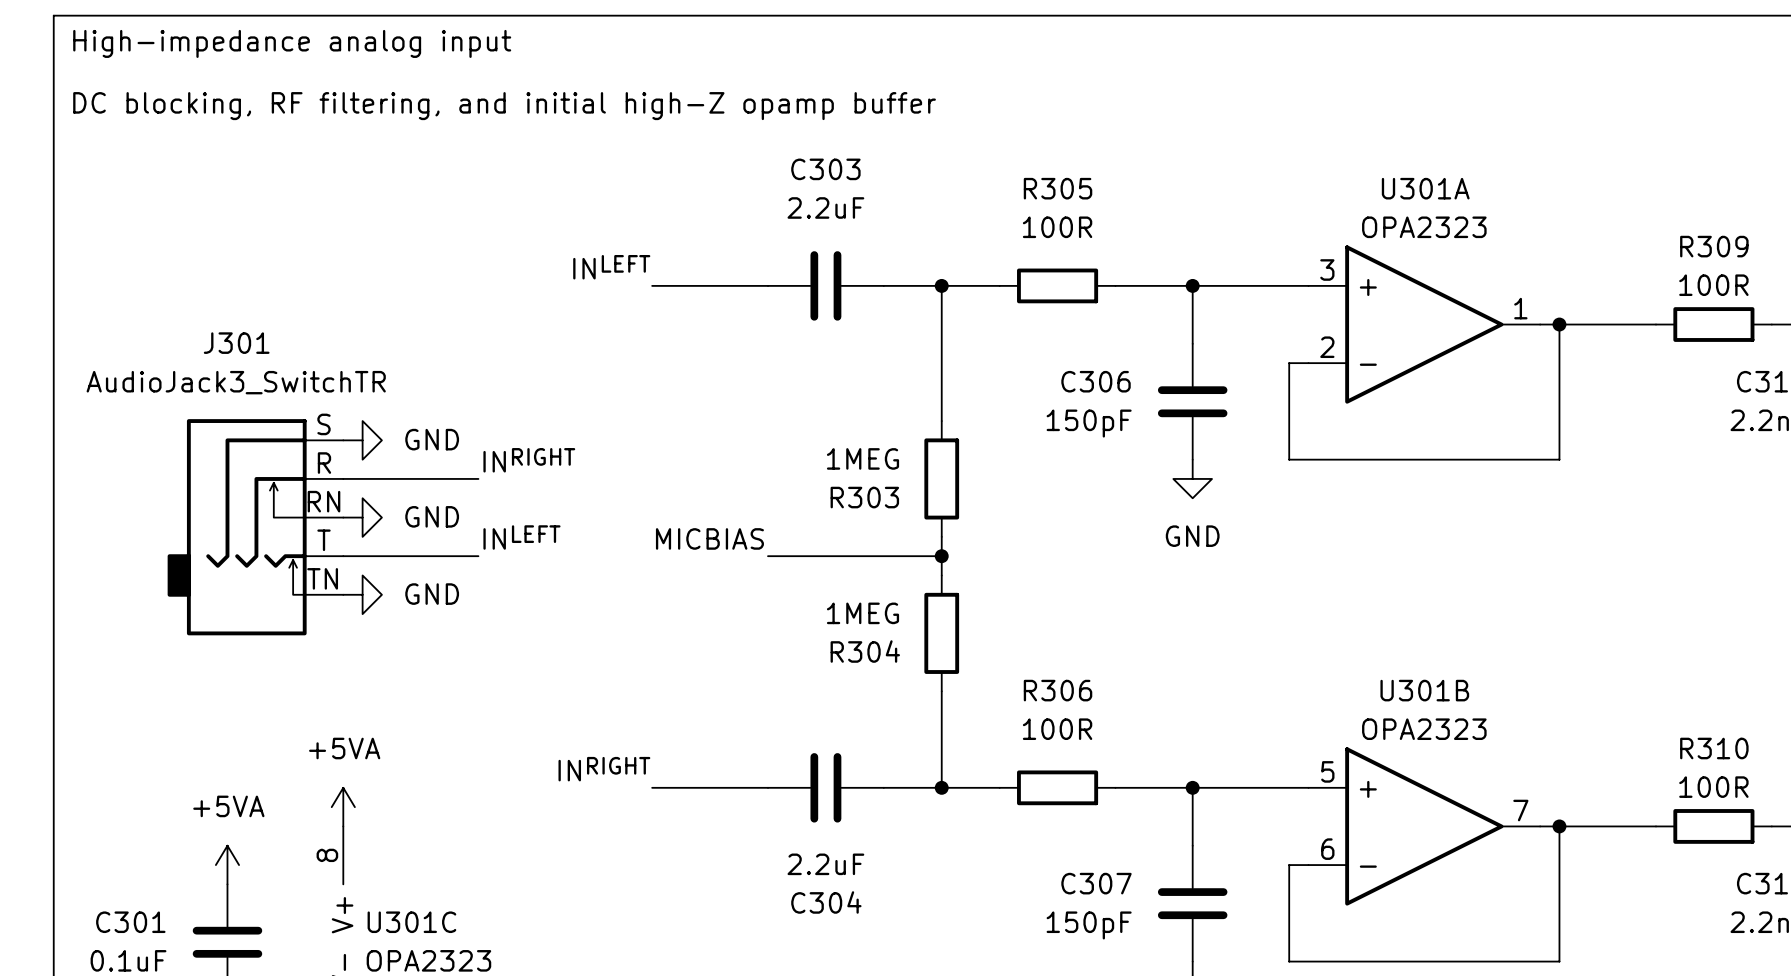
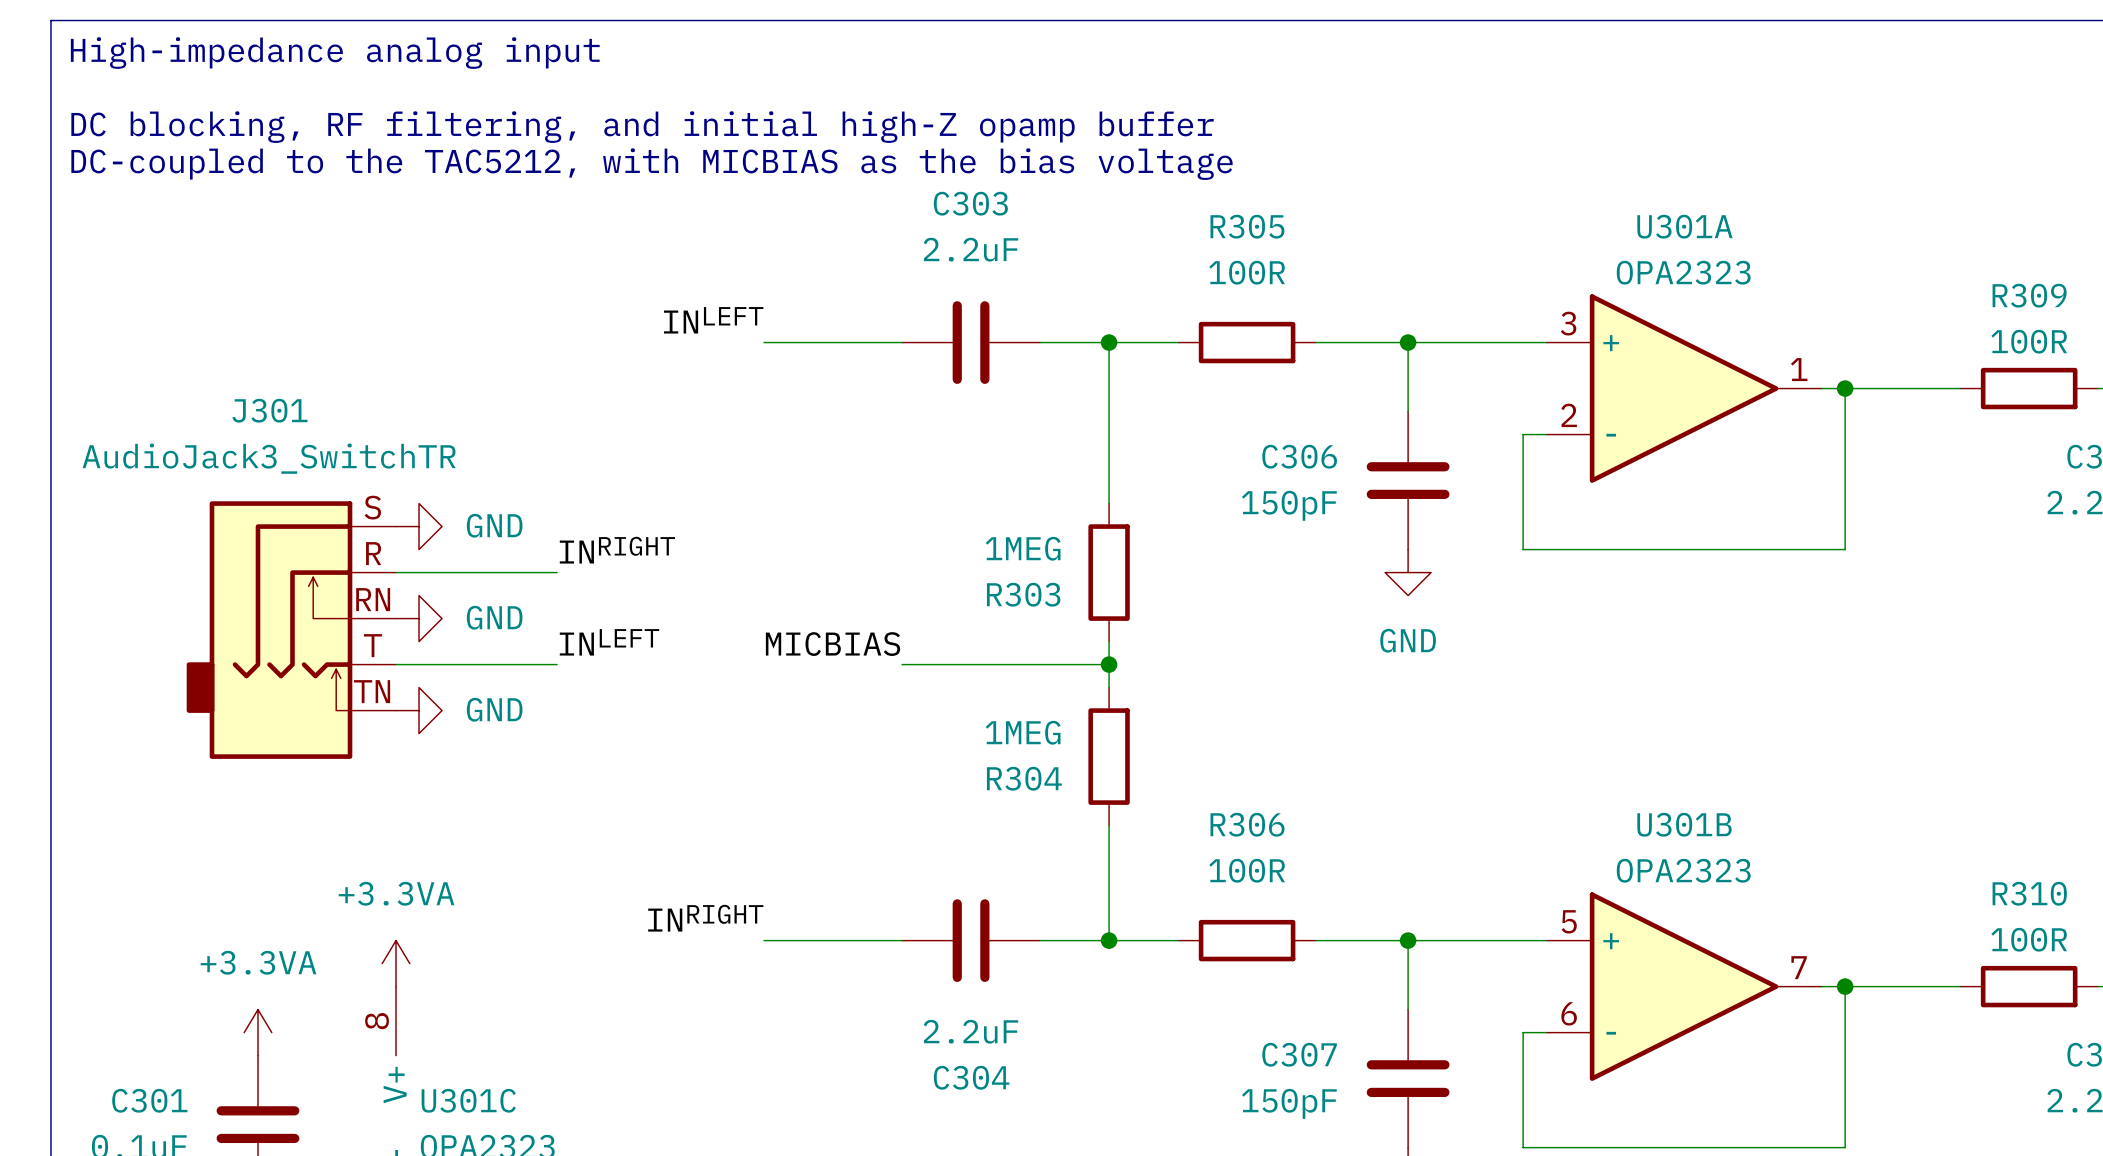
text: none -> DC-coupled to the TAC5212, with MICBIAS as the bias voltage (652, 164)
power symbol: +5VA (343, 807) -> +3.3VA (396, 963)
power symbol: +5VA (227, 865) -> +3.3VA (257, 1032)

